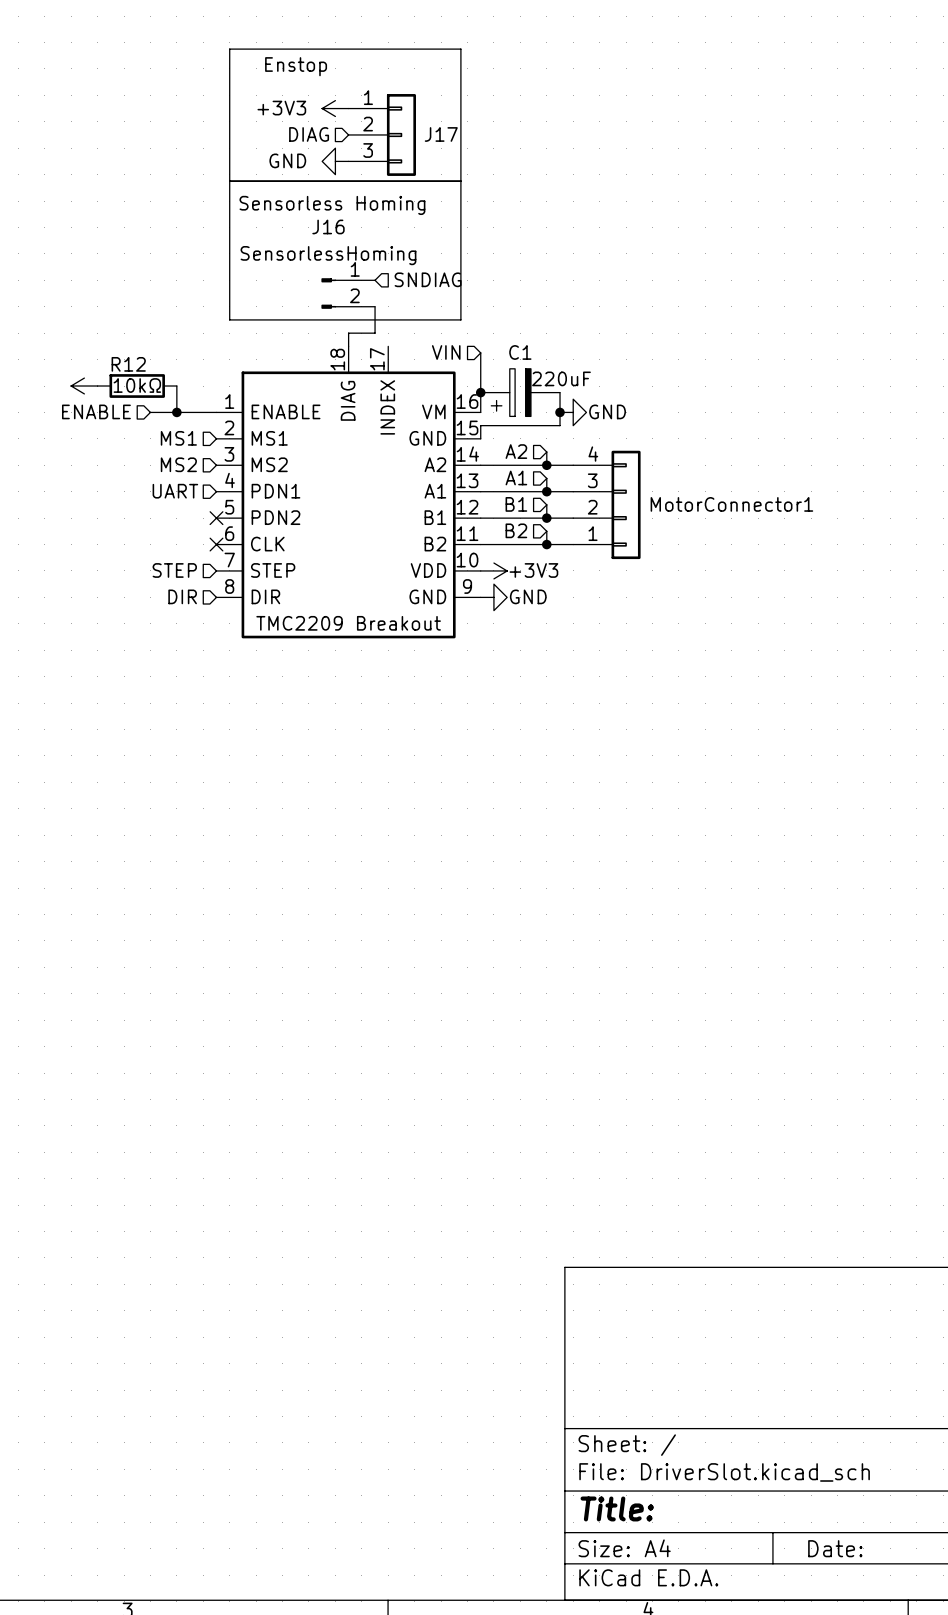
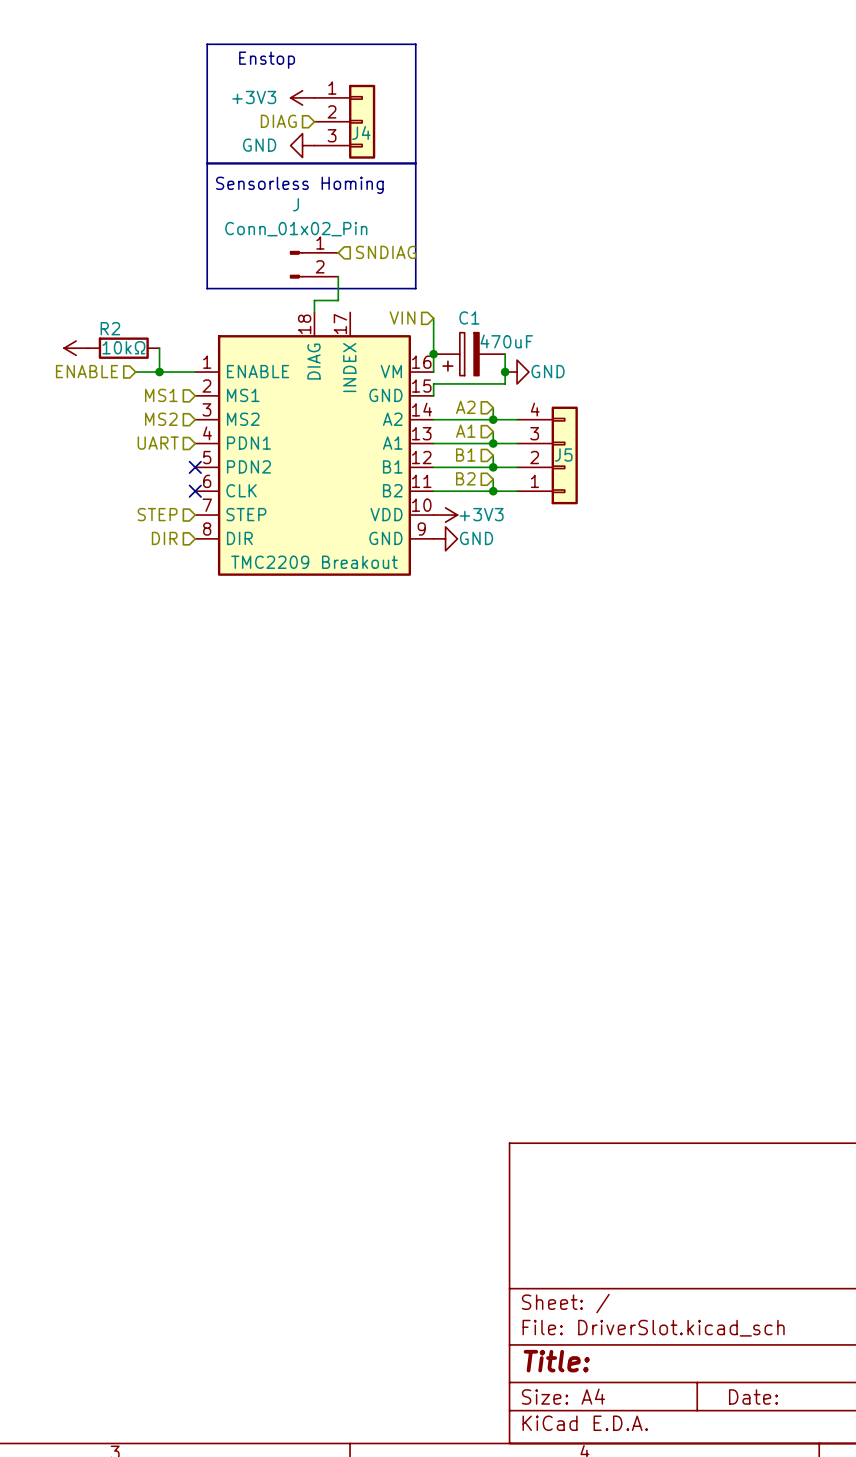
J17 name: J17 (441, 134) -> J4 (361, 132)
J16 name: J16 (328, 226) -> J (296, 204)
J16 value: SensorlessHoming (328, 255) -> Conn_01x02_Pin (296, 229)
R12 name: R12 (128, 364) -> R2 (110, 328)
C1 value: 220uF (561, 378) -> 470uF (506, 341)
MotorConnector1 name: MotorConnector1 (731, 504) -> J5 (563, 455)

